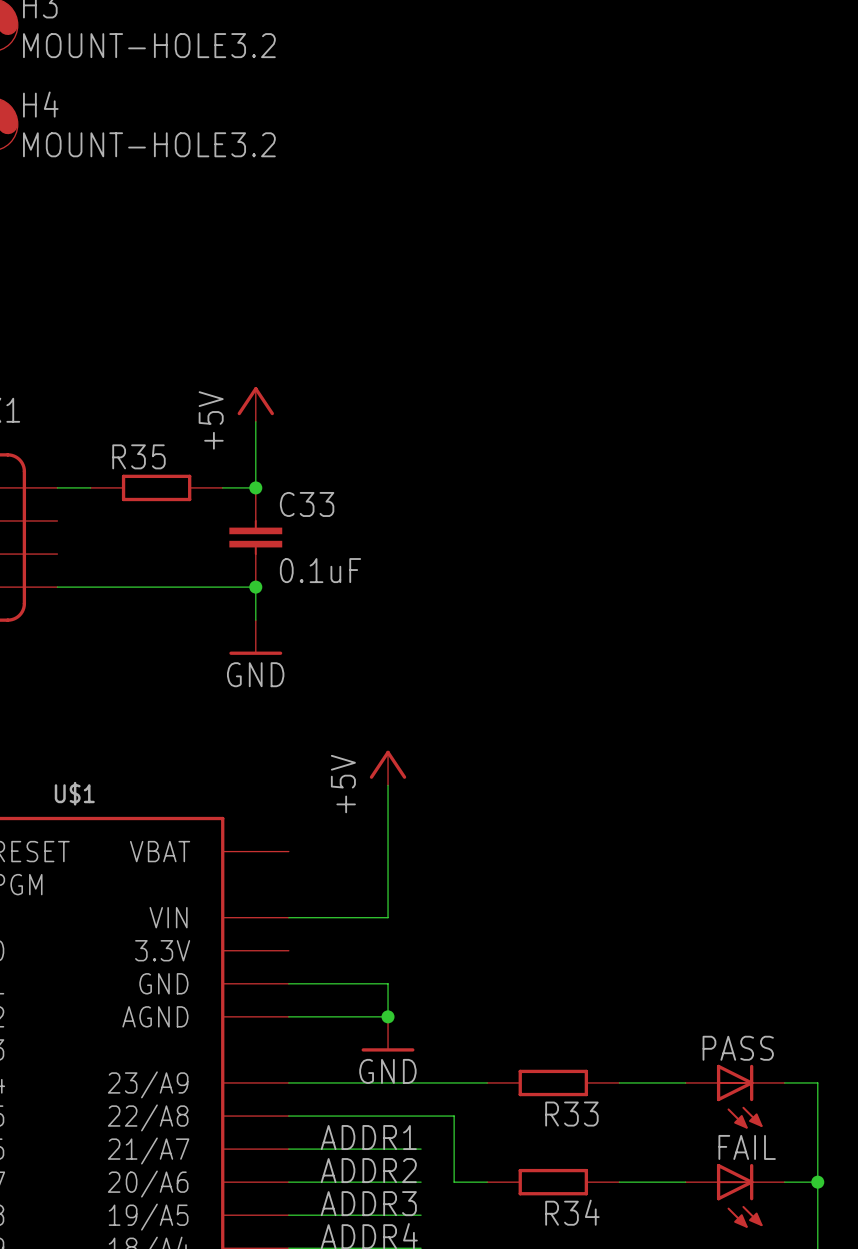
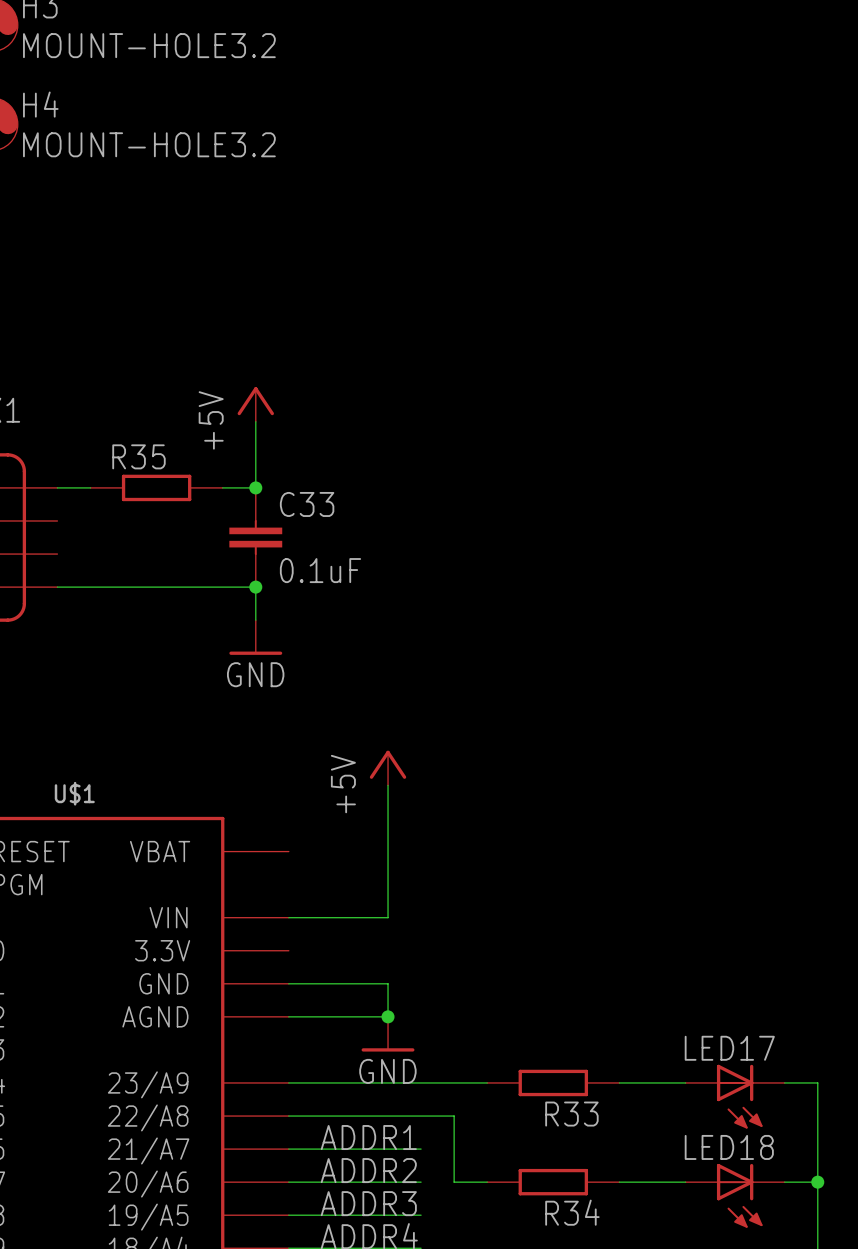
PASS name: PASS (738, 1048) -> LED17 (729, 1048)
FAIL name: FAIL (747, 1147) -> LED18 (729, 1147)

